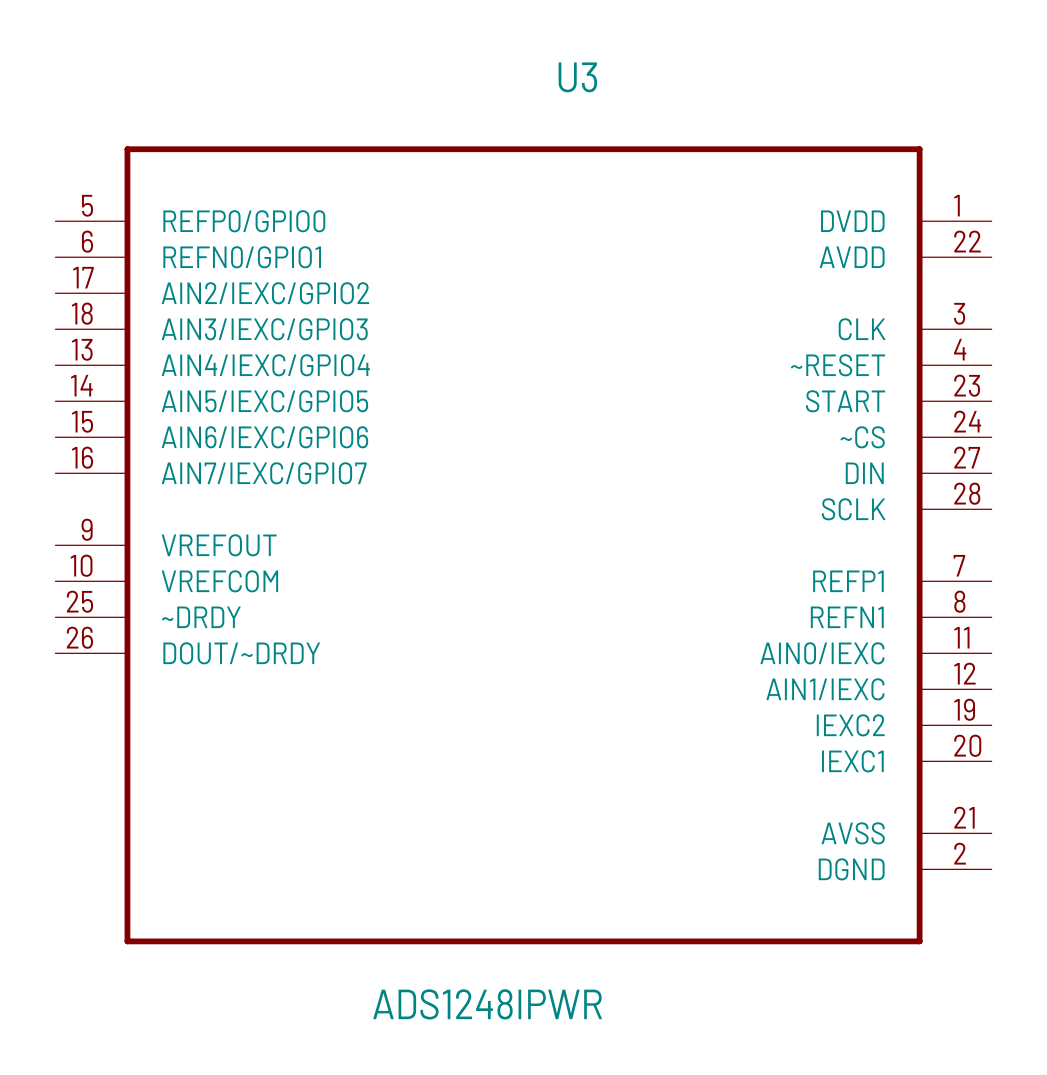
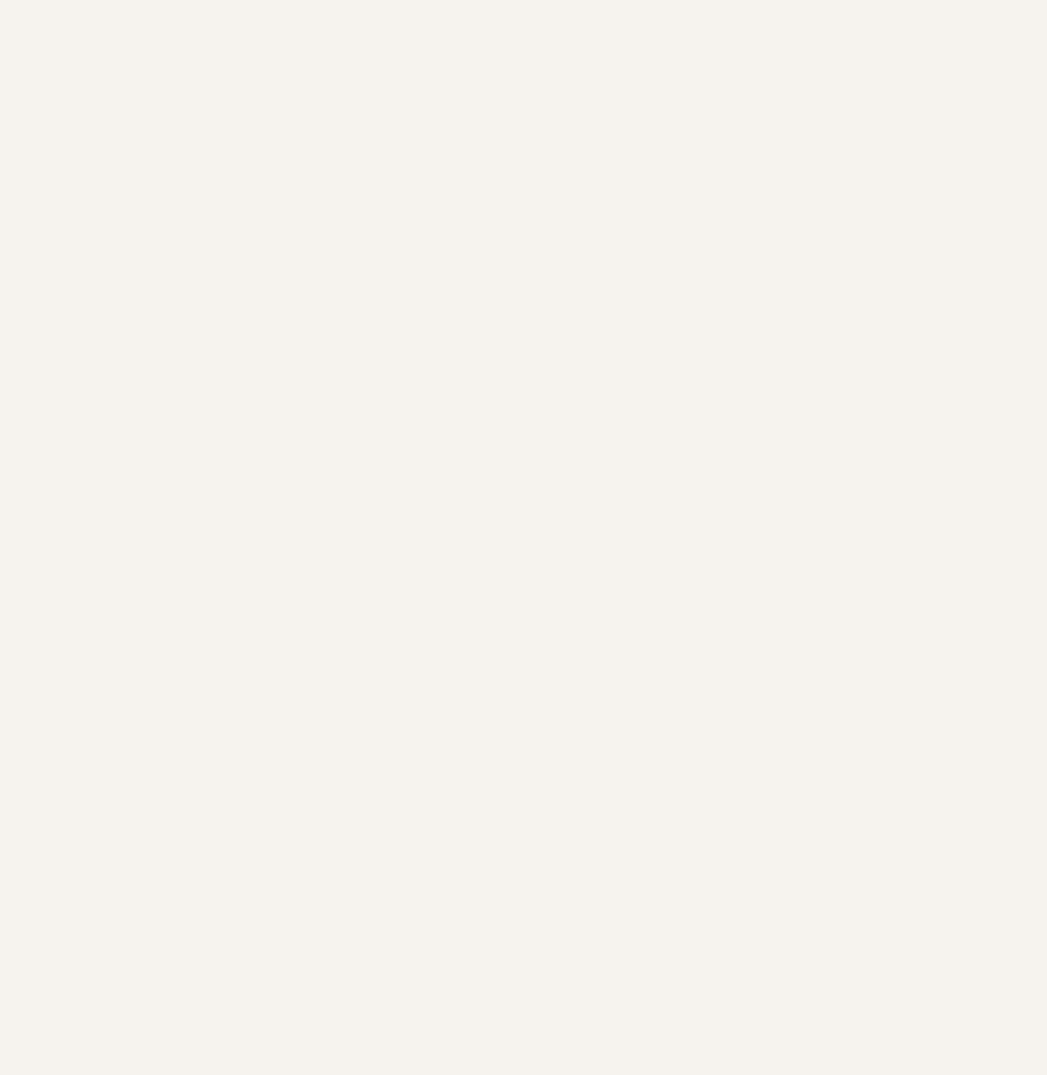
U3: ADS1248IPWR (523, 545) -> none

